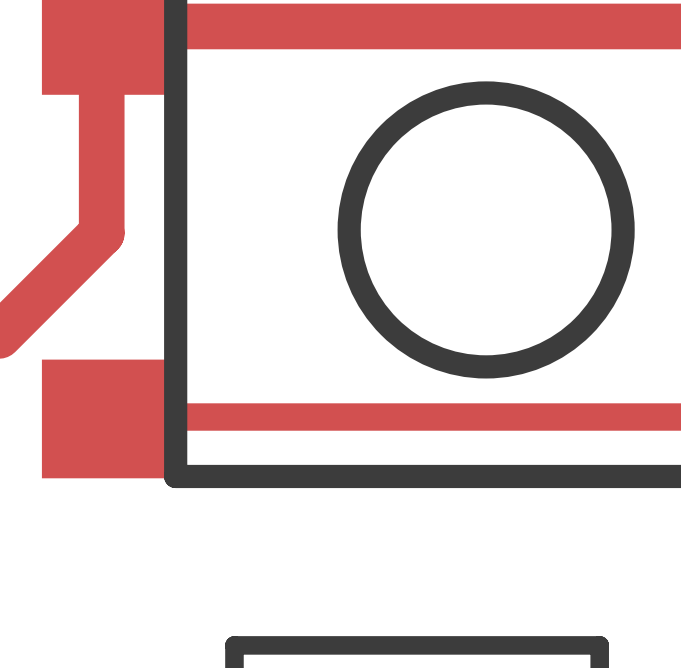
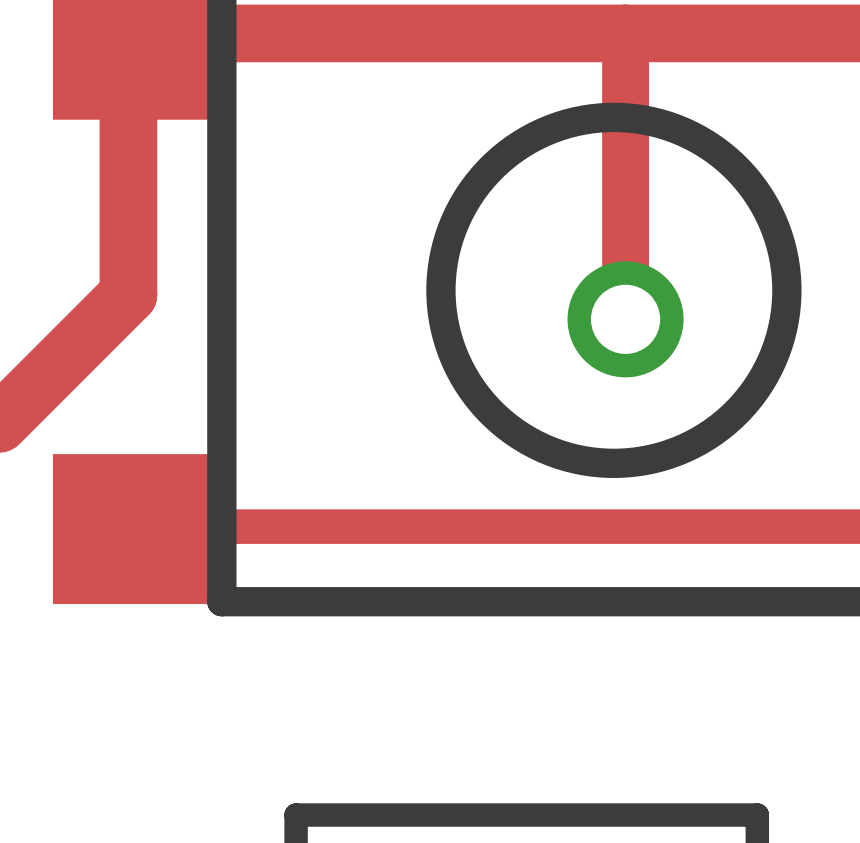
track: none -> (625, 33) (625, 319)
via: none -> (625, 319)

